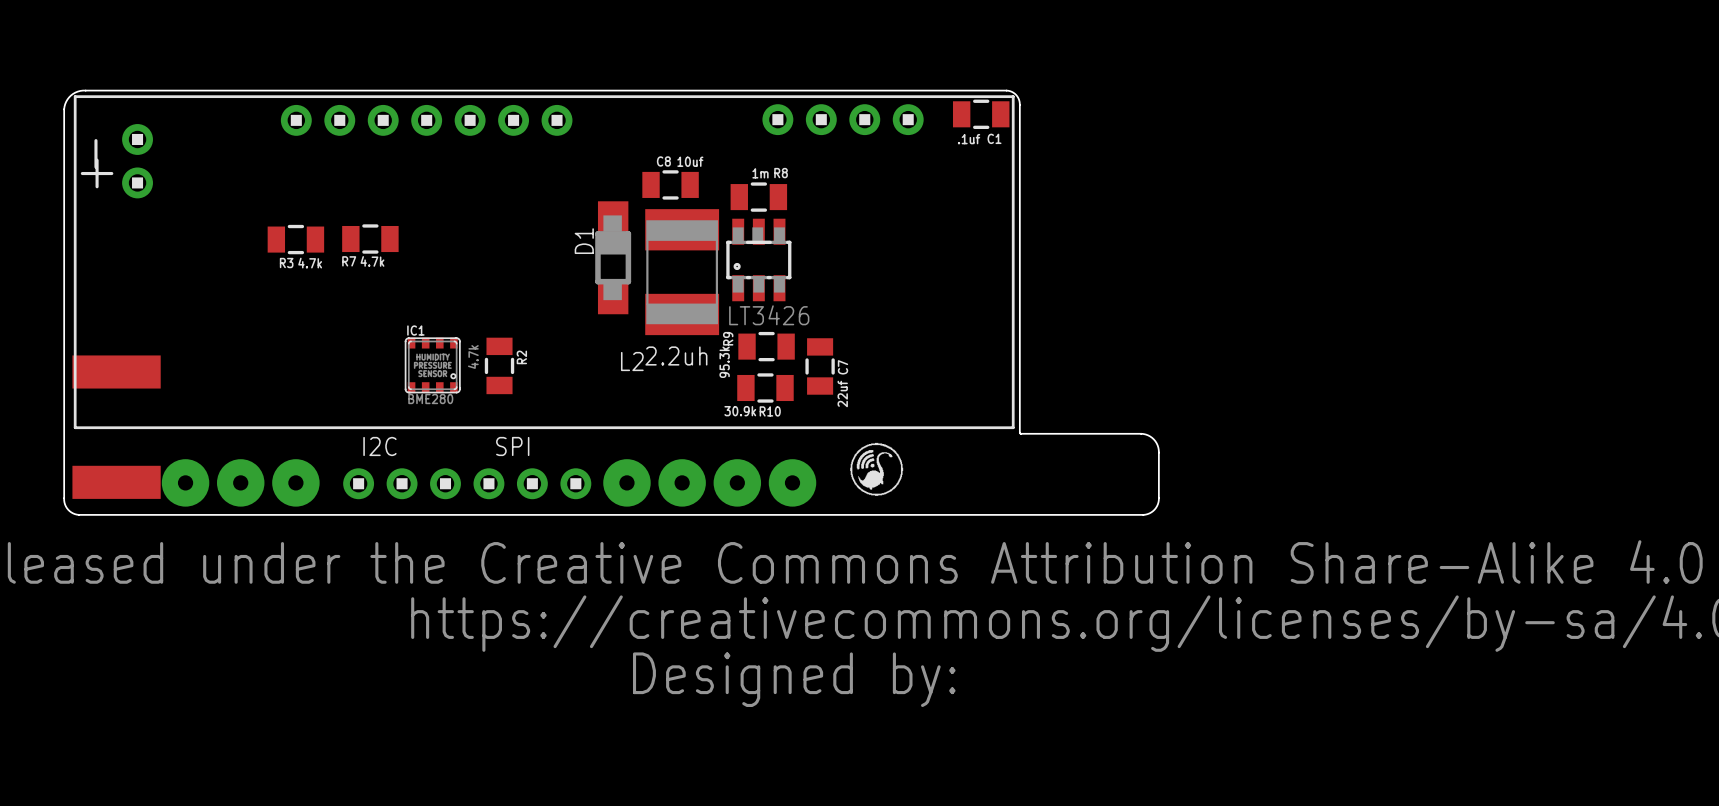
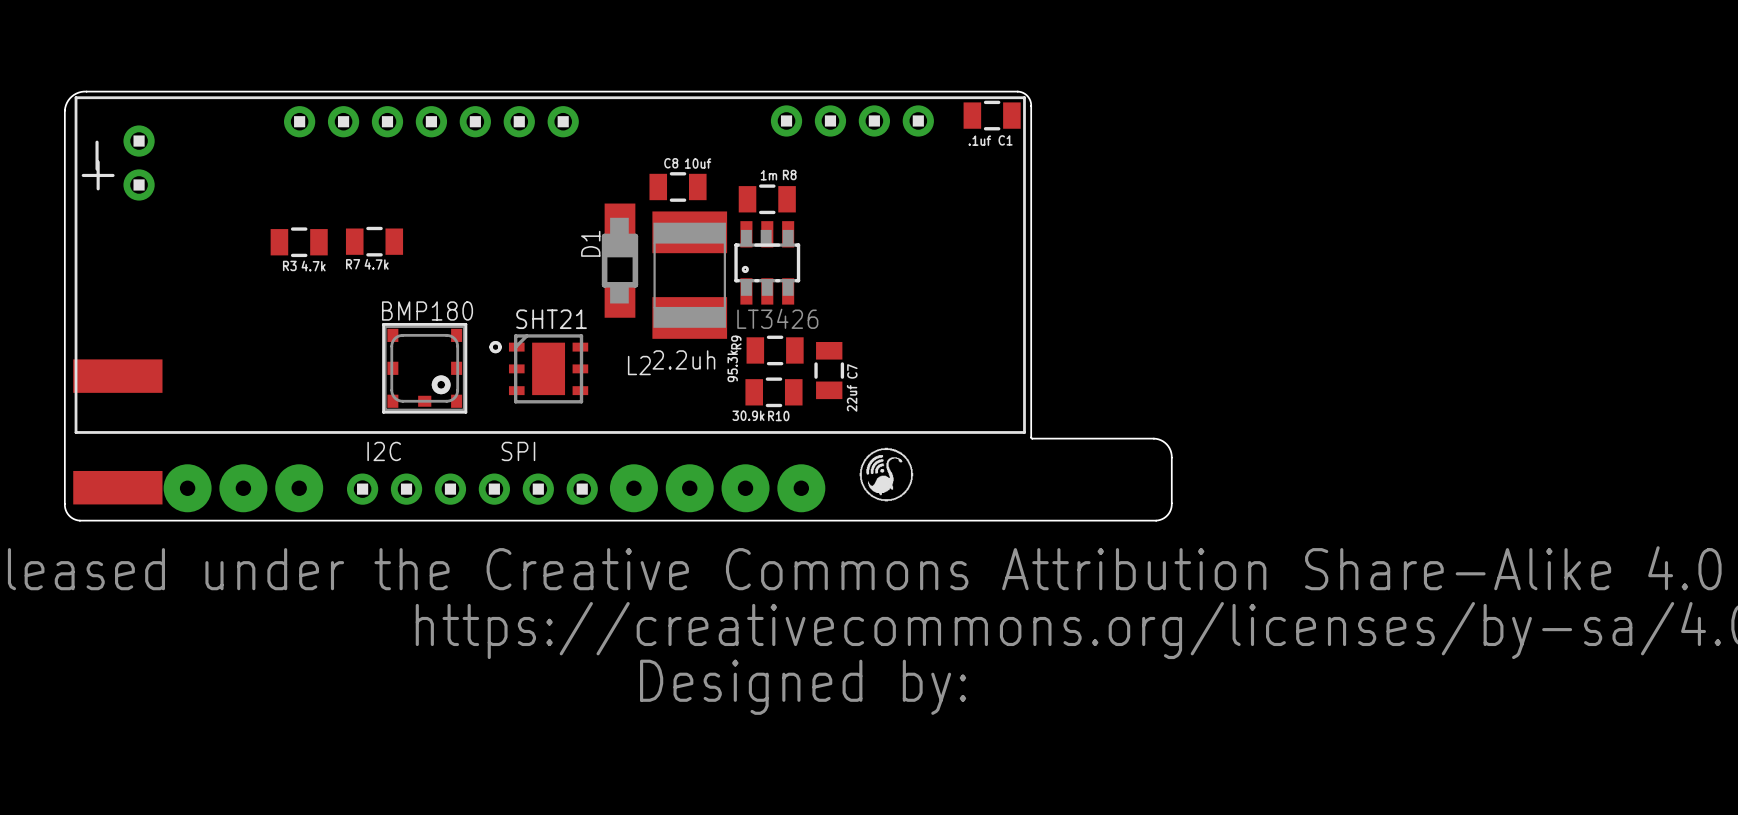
BMP180: none -> (424, 368)
SHT21: none -> (538, 368)
IC1: BME280 (432, 365) -> none
R2: 4.7k (499, 365) -> none

